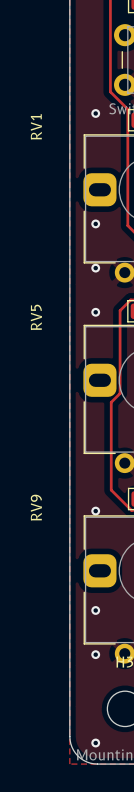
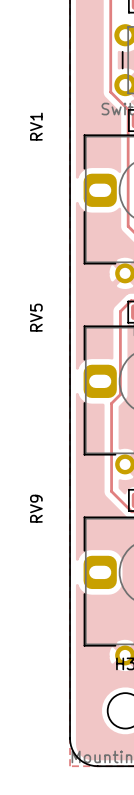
via: (95, 113) -> none
via: (95, 223) -> none
via: (95, 268) -> none
via: (95, 312) -> none
via: (95, 511) -> none
via: (95, 610) -> none
via: (95, 654) -> none
via: (95, 743) -> none

